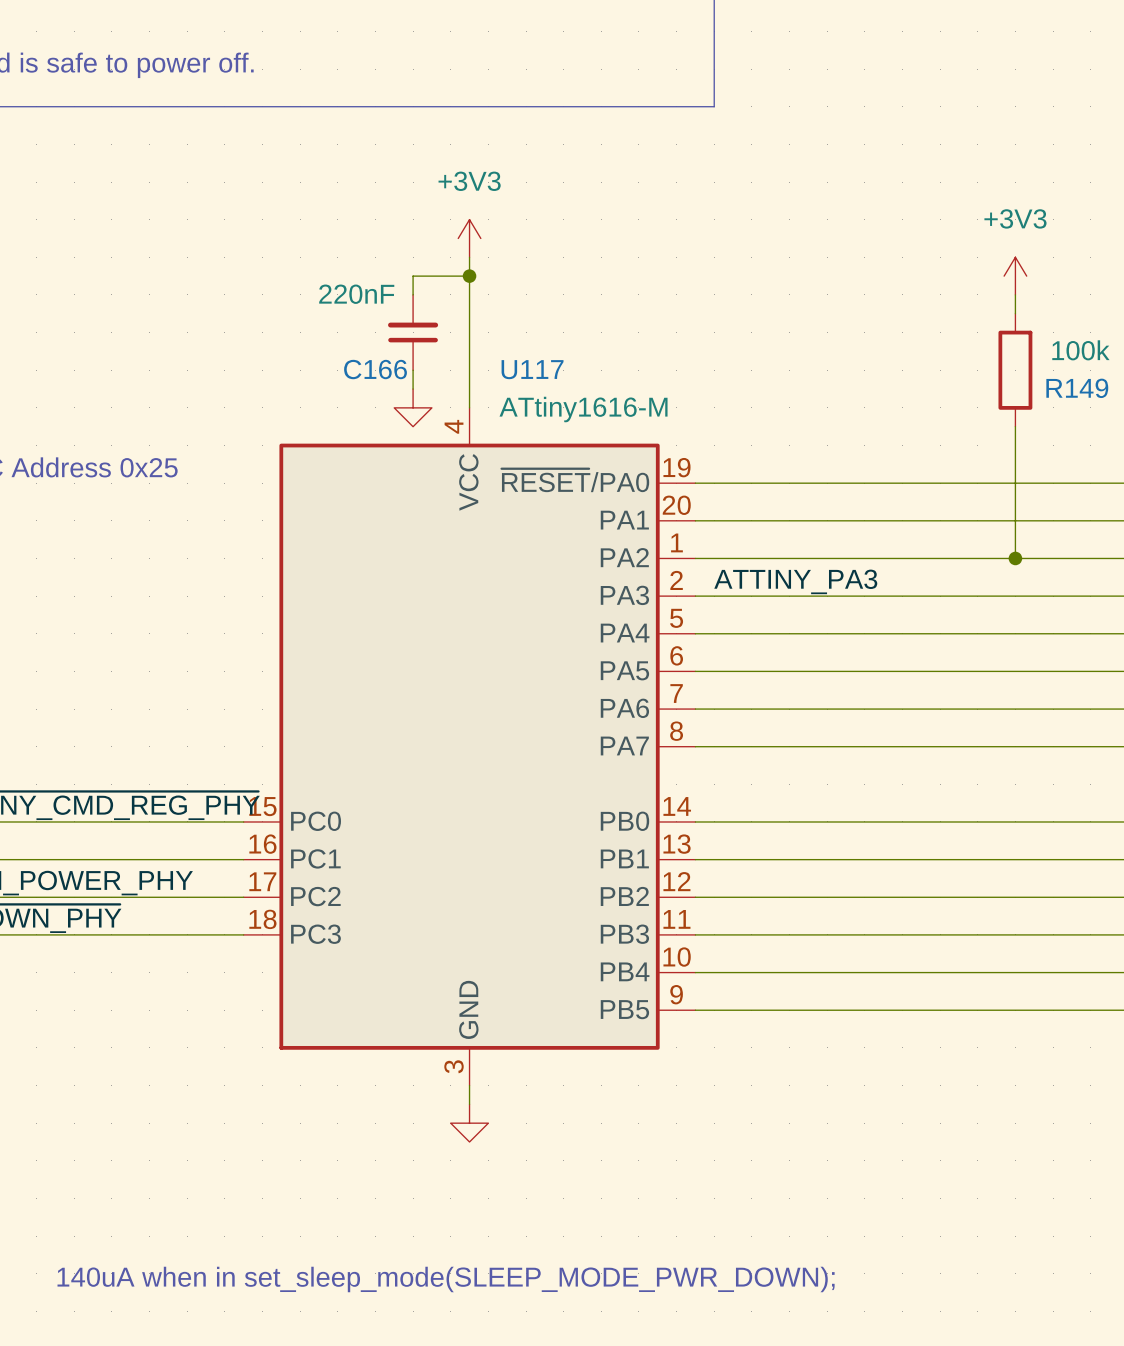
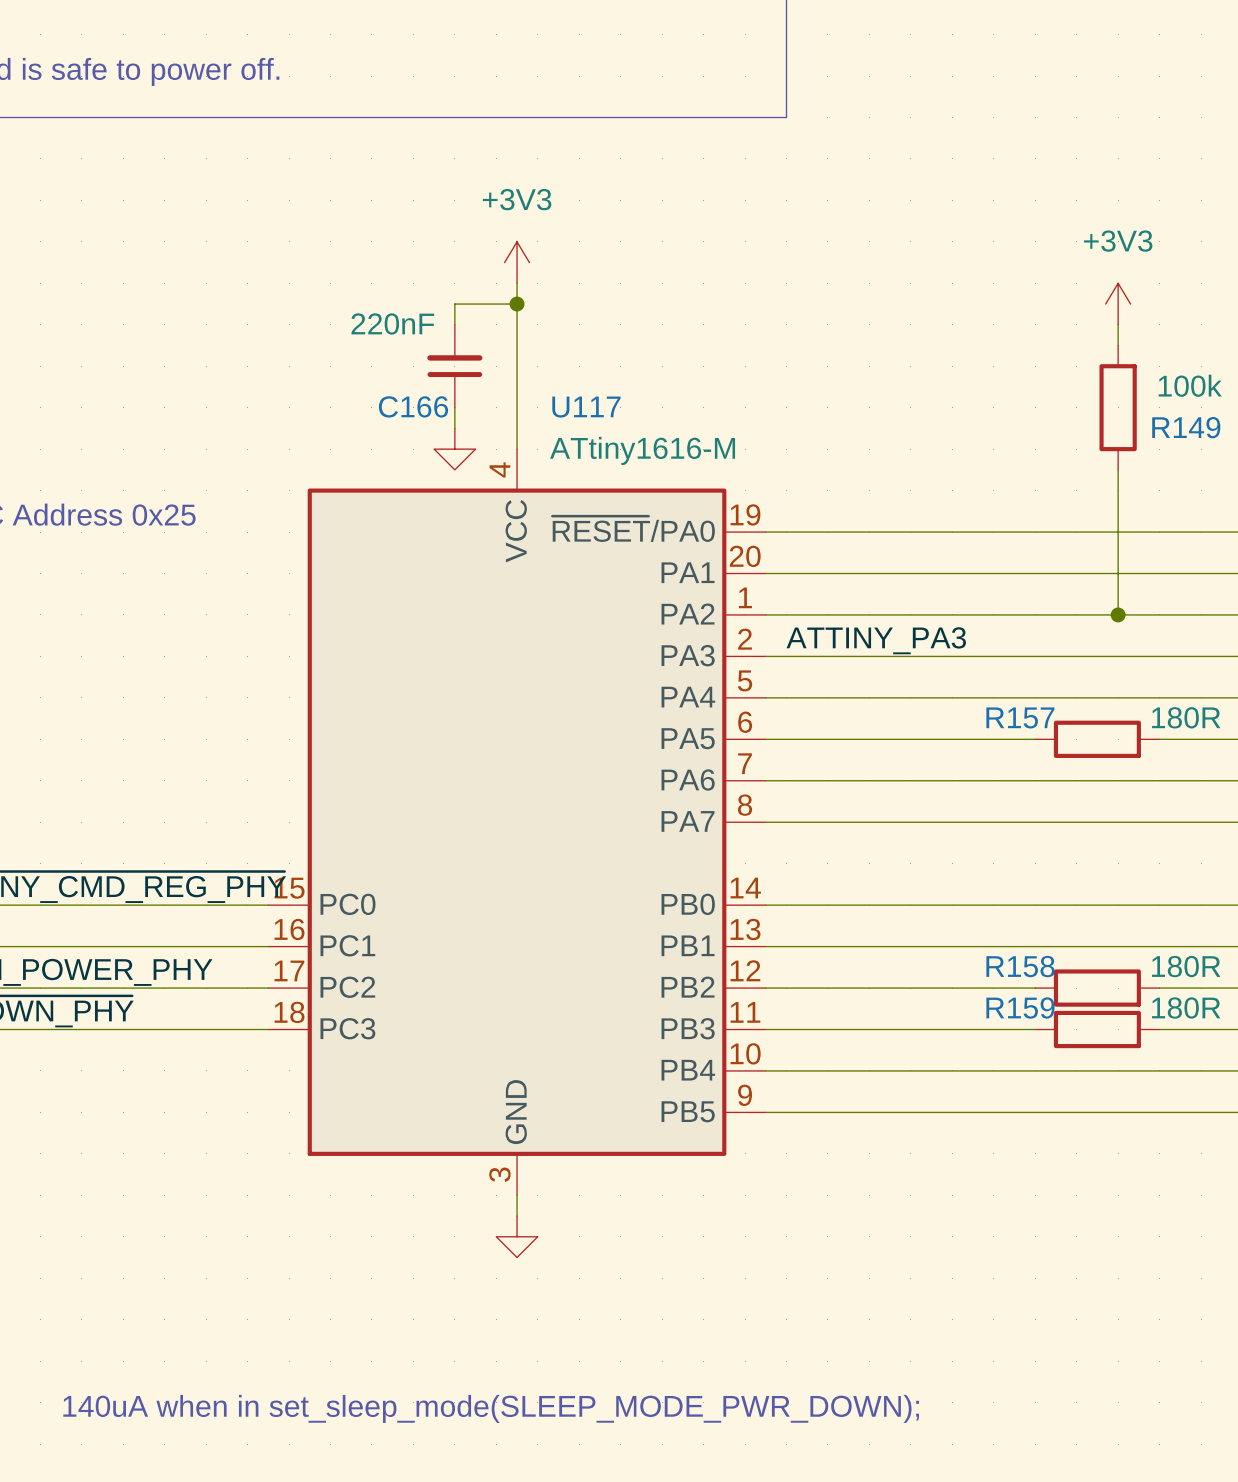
wire: (940, 671) (1053, 671) -> none
R157: none -> 180R (1097, 739)
wire: (940, 897) (1053, 897) -> none
R158: none -> 180R (1097, 988)
wire: (940, 934) (1053, 934) -> none
R159: none -> 180R (1097, 1029)

